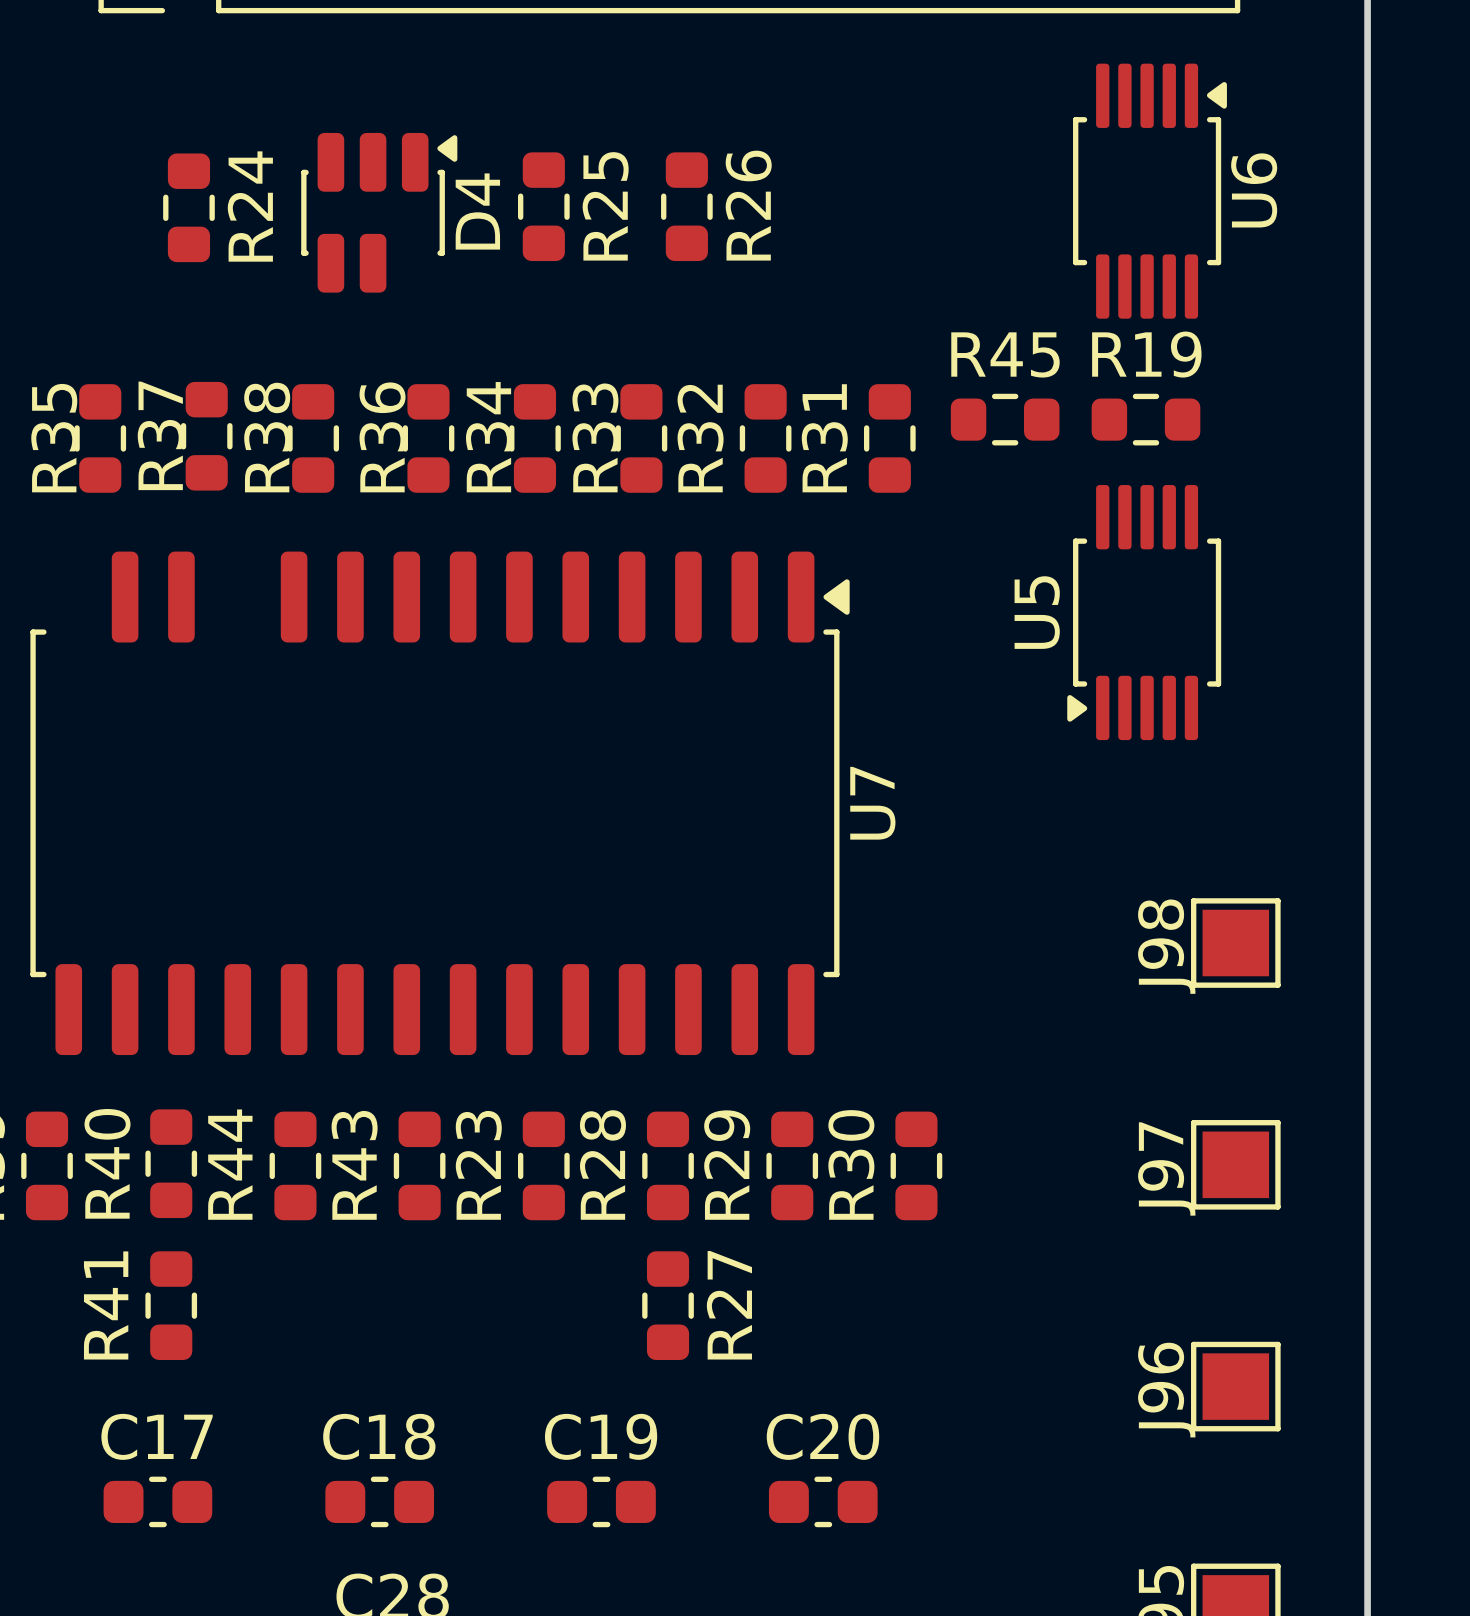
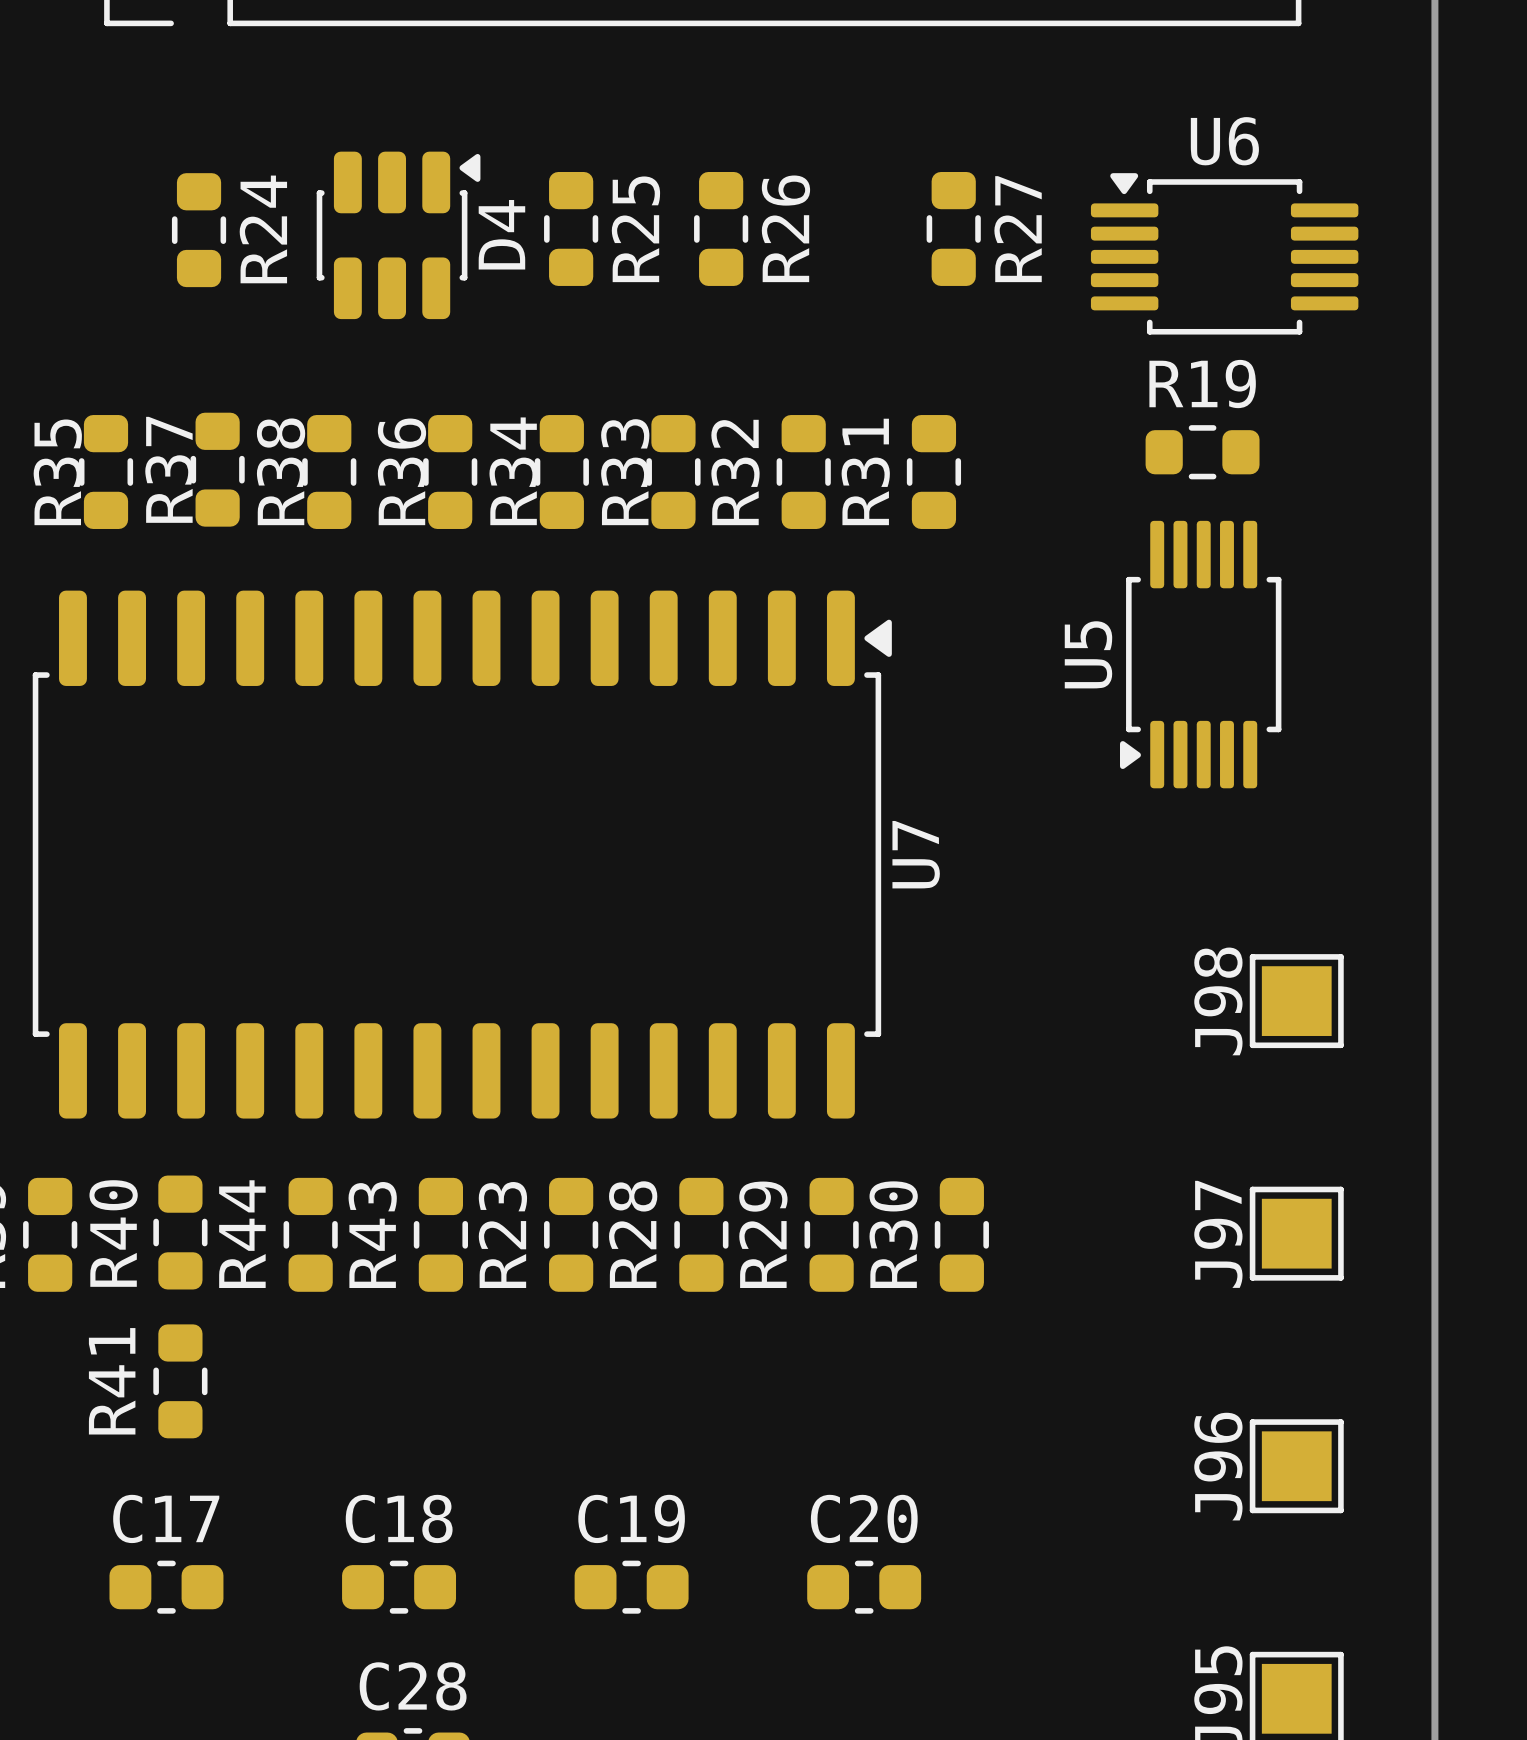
D4 footprint: [301, 132, 458, 293] -> [316, 151, 481, 320]
U6 rotation: 0° (1149, 191) -> 90° counterclockwise (1224, 253)
R45: (1005, 419) -> none
U7 footprint: [30, 551, 850, 1056] -> [32, 590, 892, 1119]
R27 position: (668, 1305) -> (953, 228)

